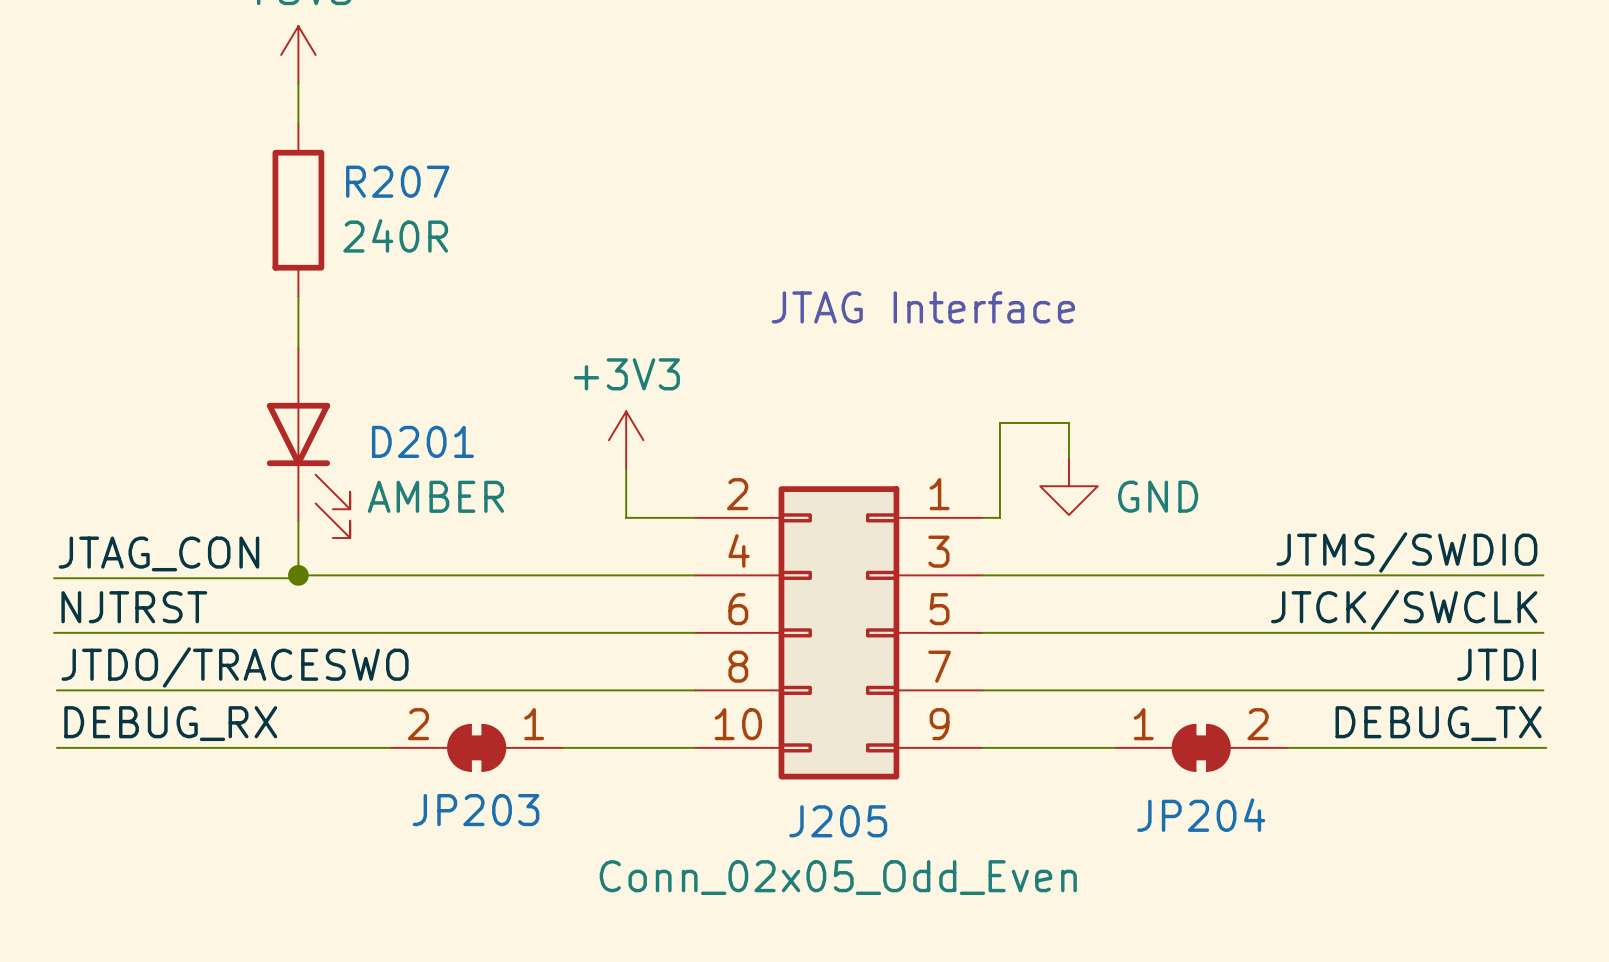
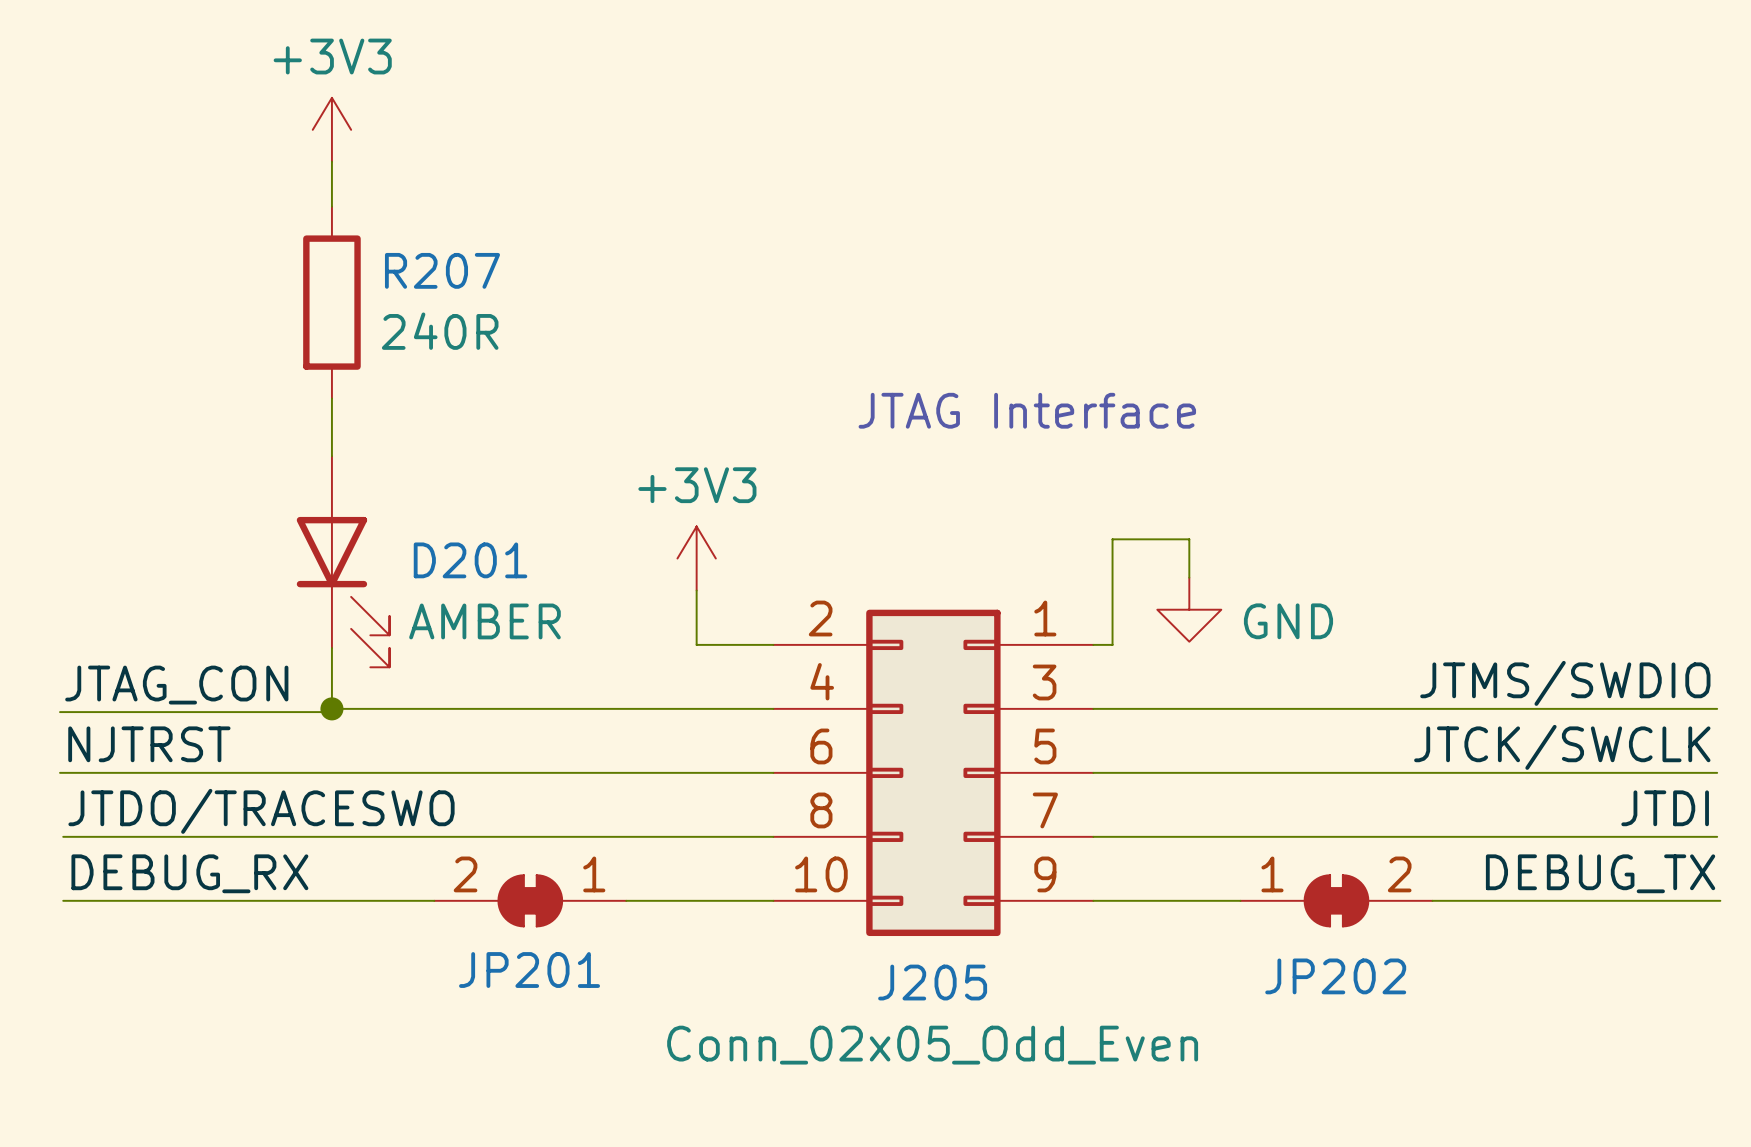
JP203 name: JP203 (475, 810) -> JP201 (529, 970)
JP204 name: JP204 (1201, 815) -> JP202 (1335, 976)

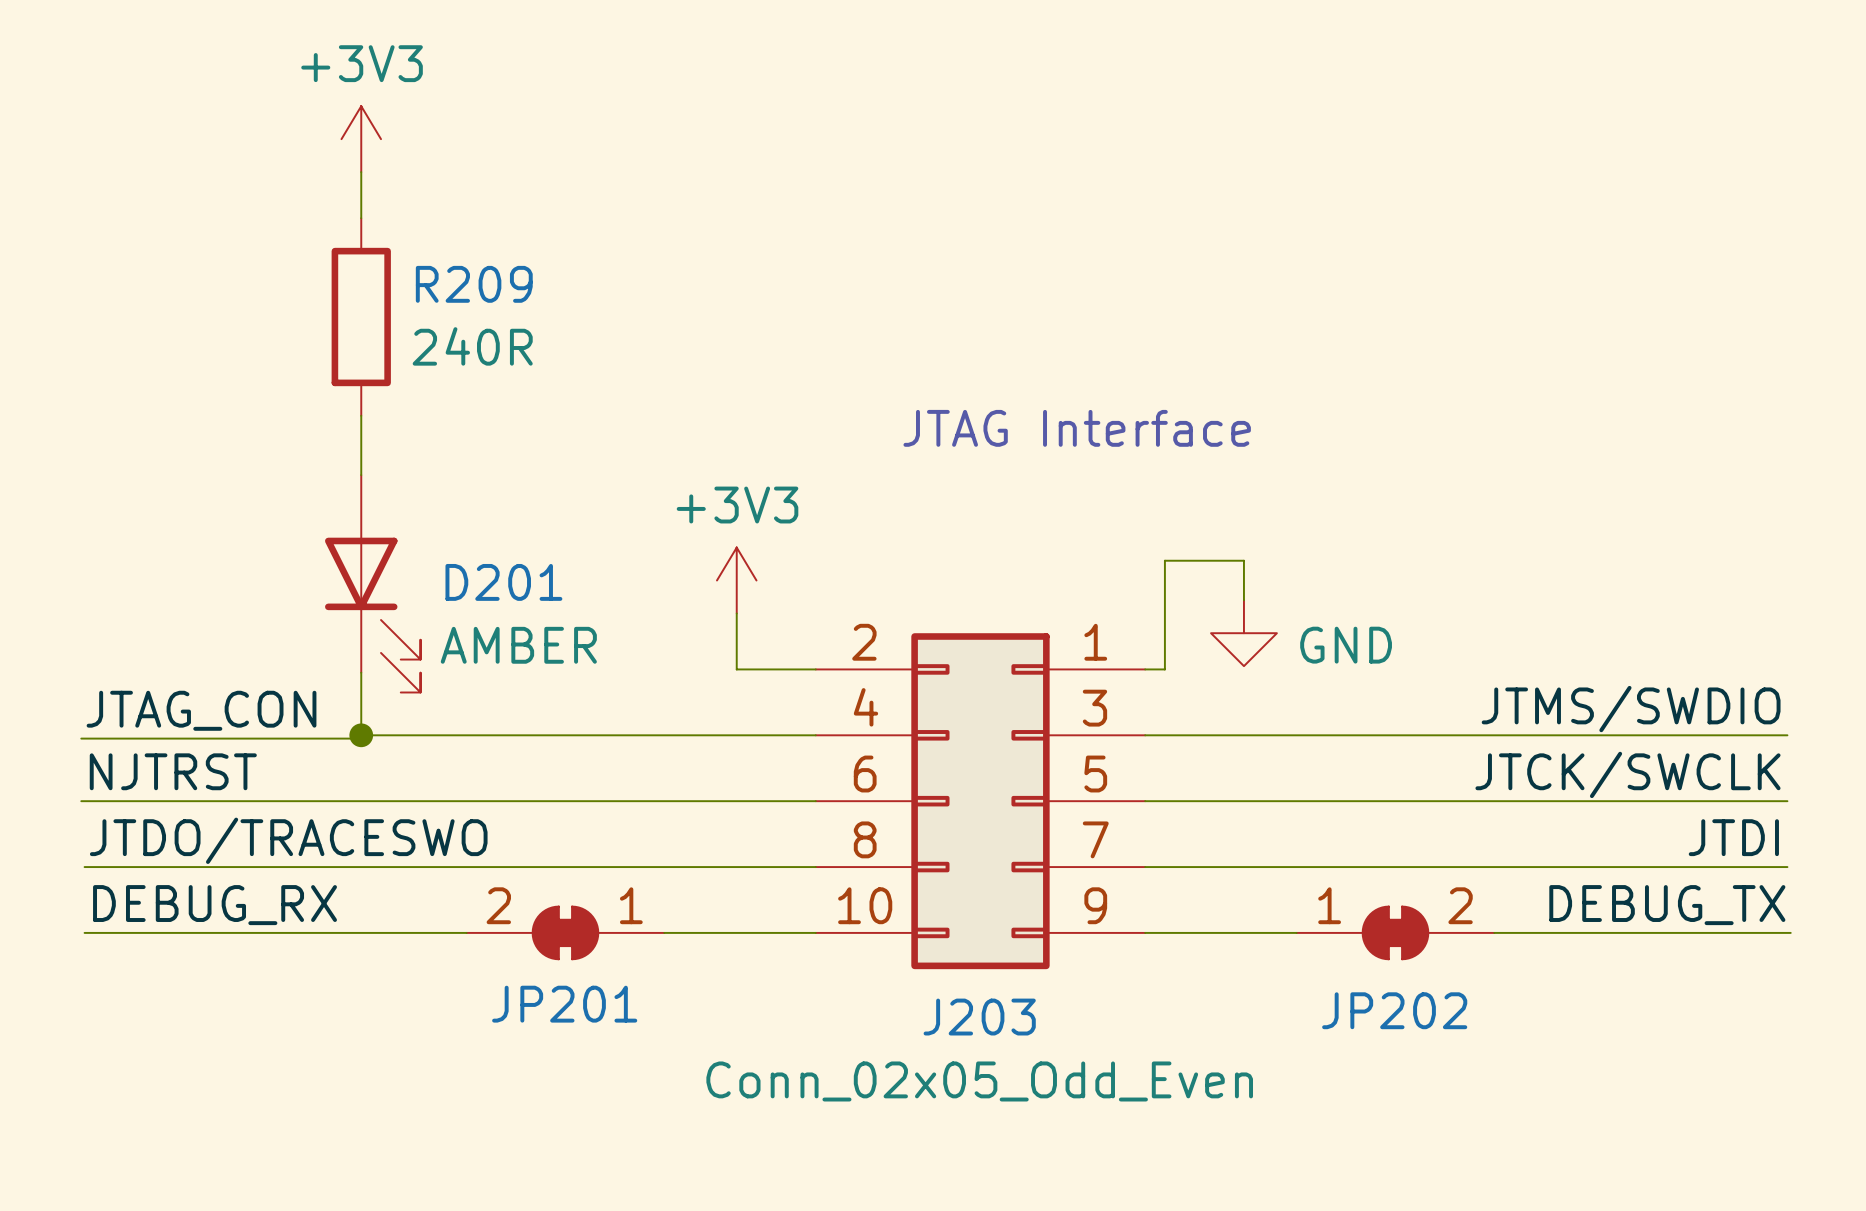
R207 name: R207 (442, 270) -> R209 (474, 284)
J205 name: J205 (932, 982) -> J203 (979, 1017)

